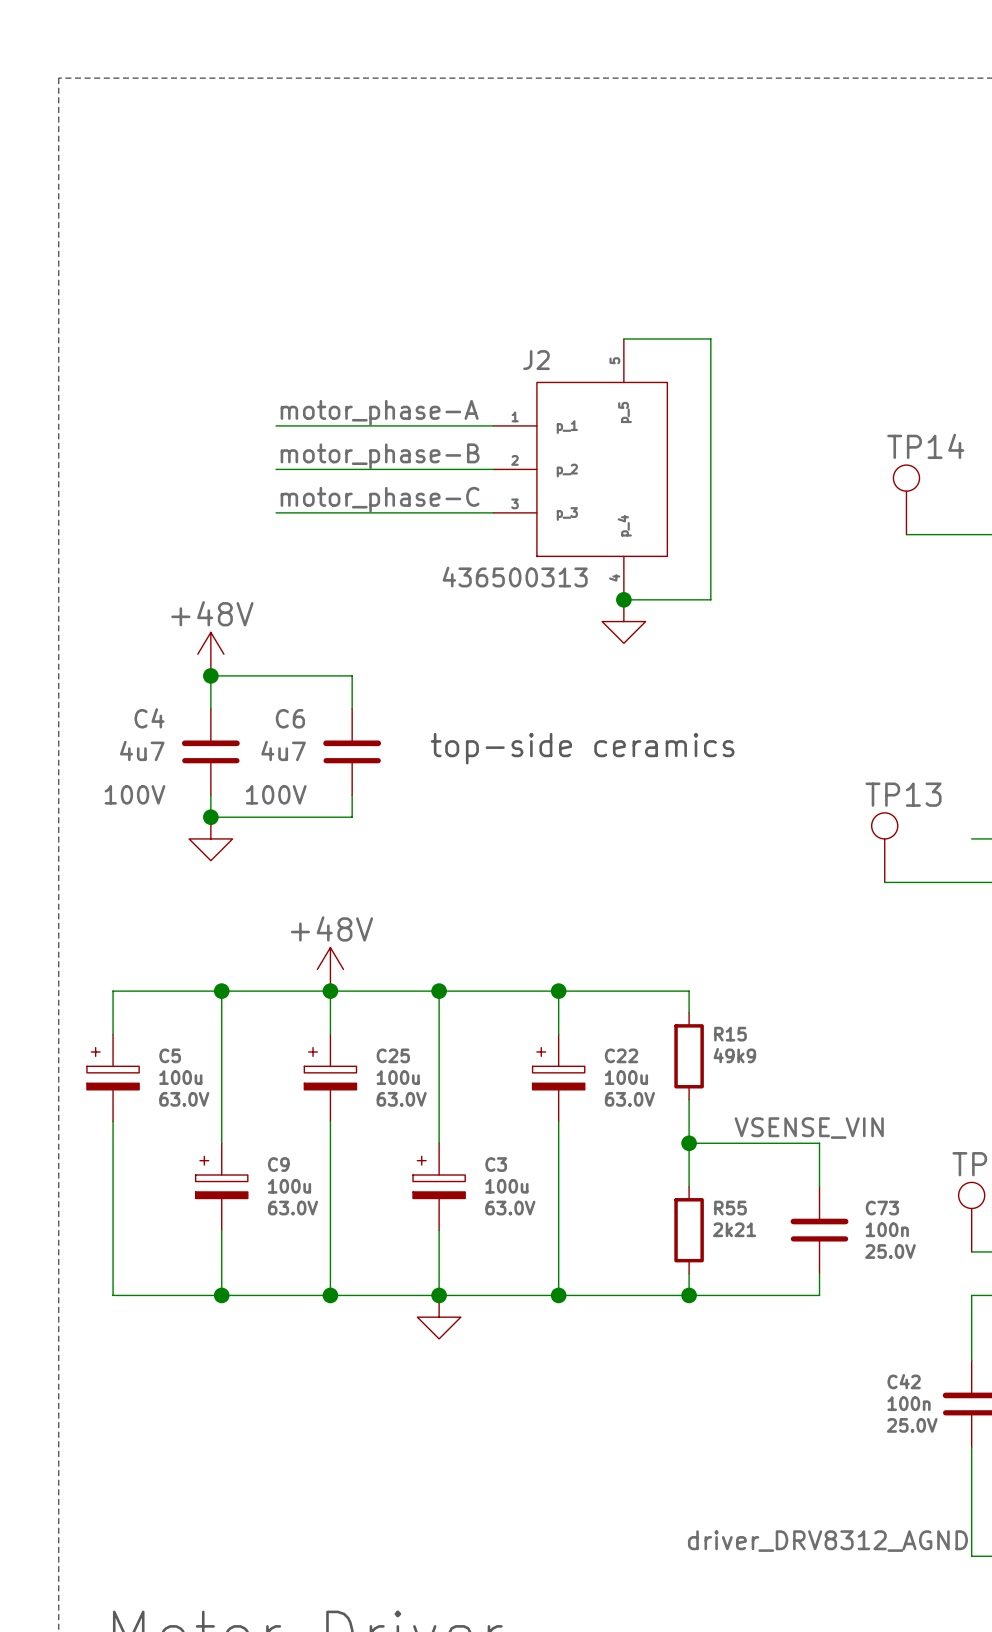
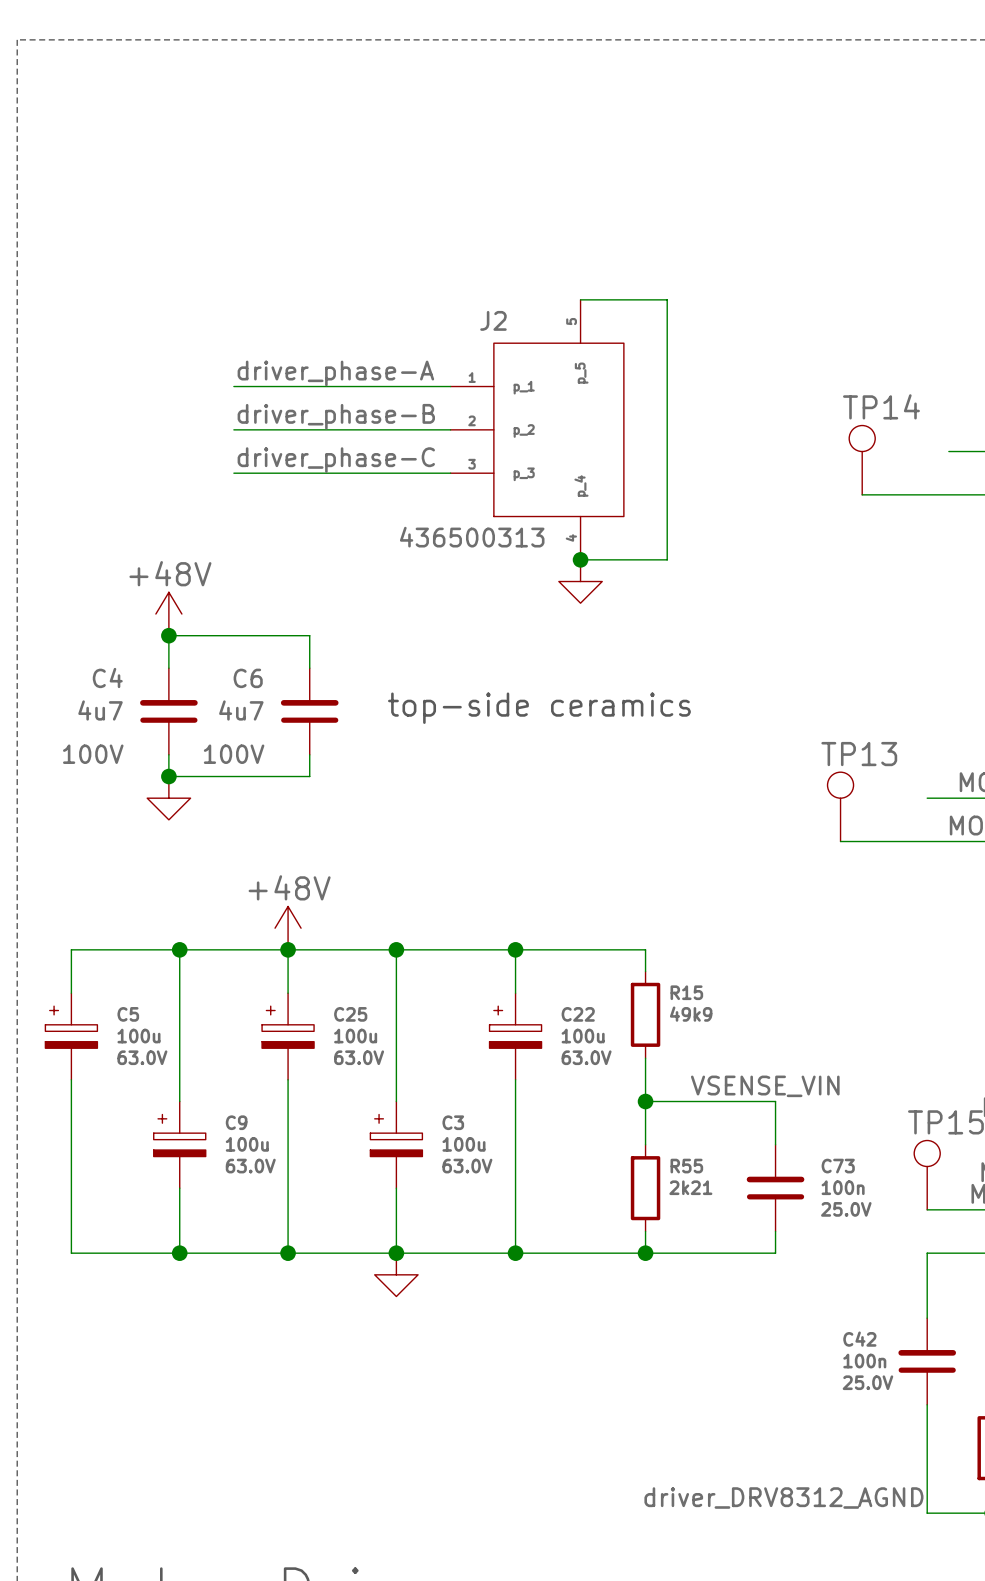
label: motor_phase-A (379, 412) -> driver_phase-A (335, 373)
label: motor_phase-B (380, 456) -> driver_phase-B (336, 416)
label: motor_phase-C (380, 499) -> driver_phase-C (336, 460)

